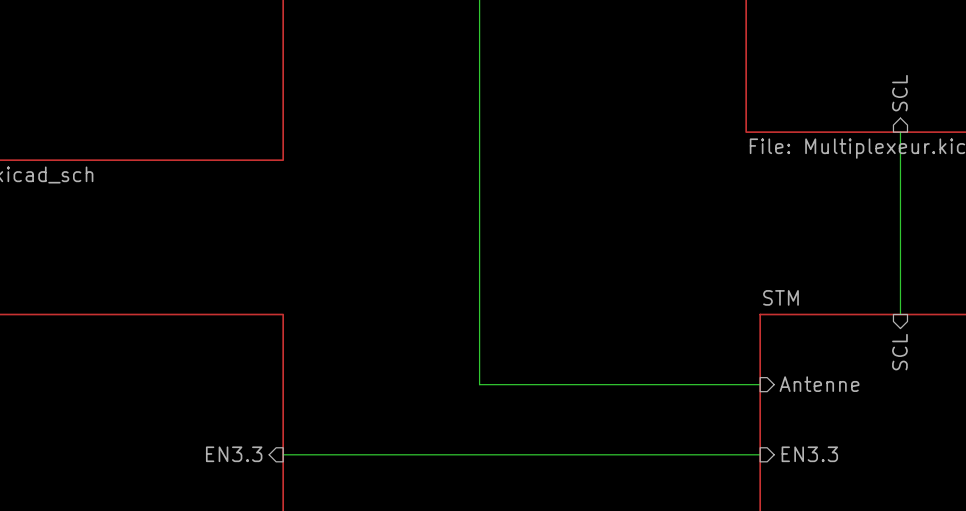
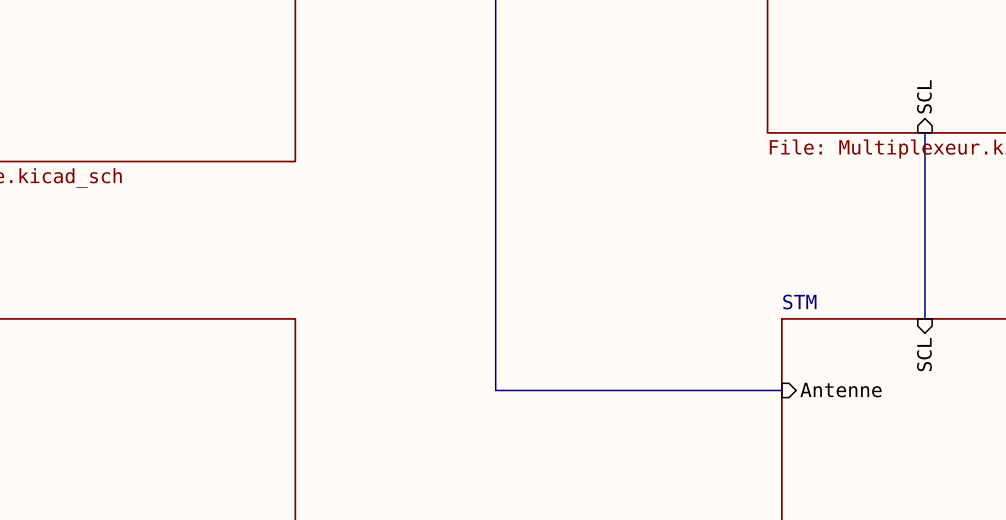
sheet pin: EN3.3 (234, 454) -> none
wire: (283, 454) (760, 454) -> none
sheet pin: EN3.3 (809, 454) -> none

